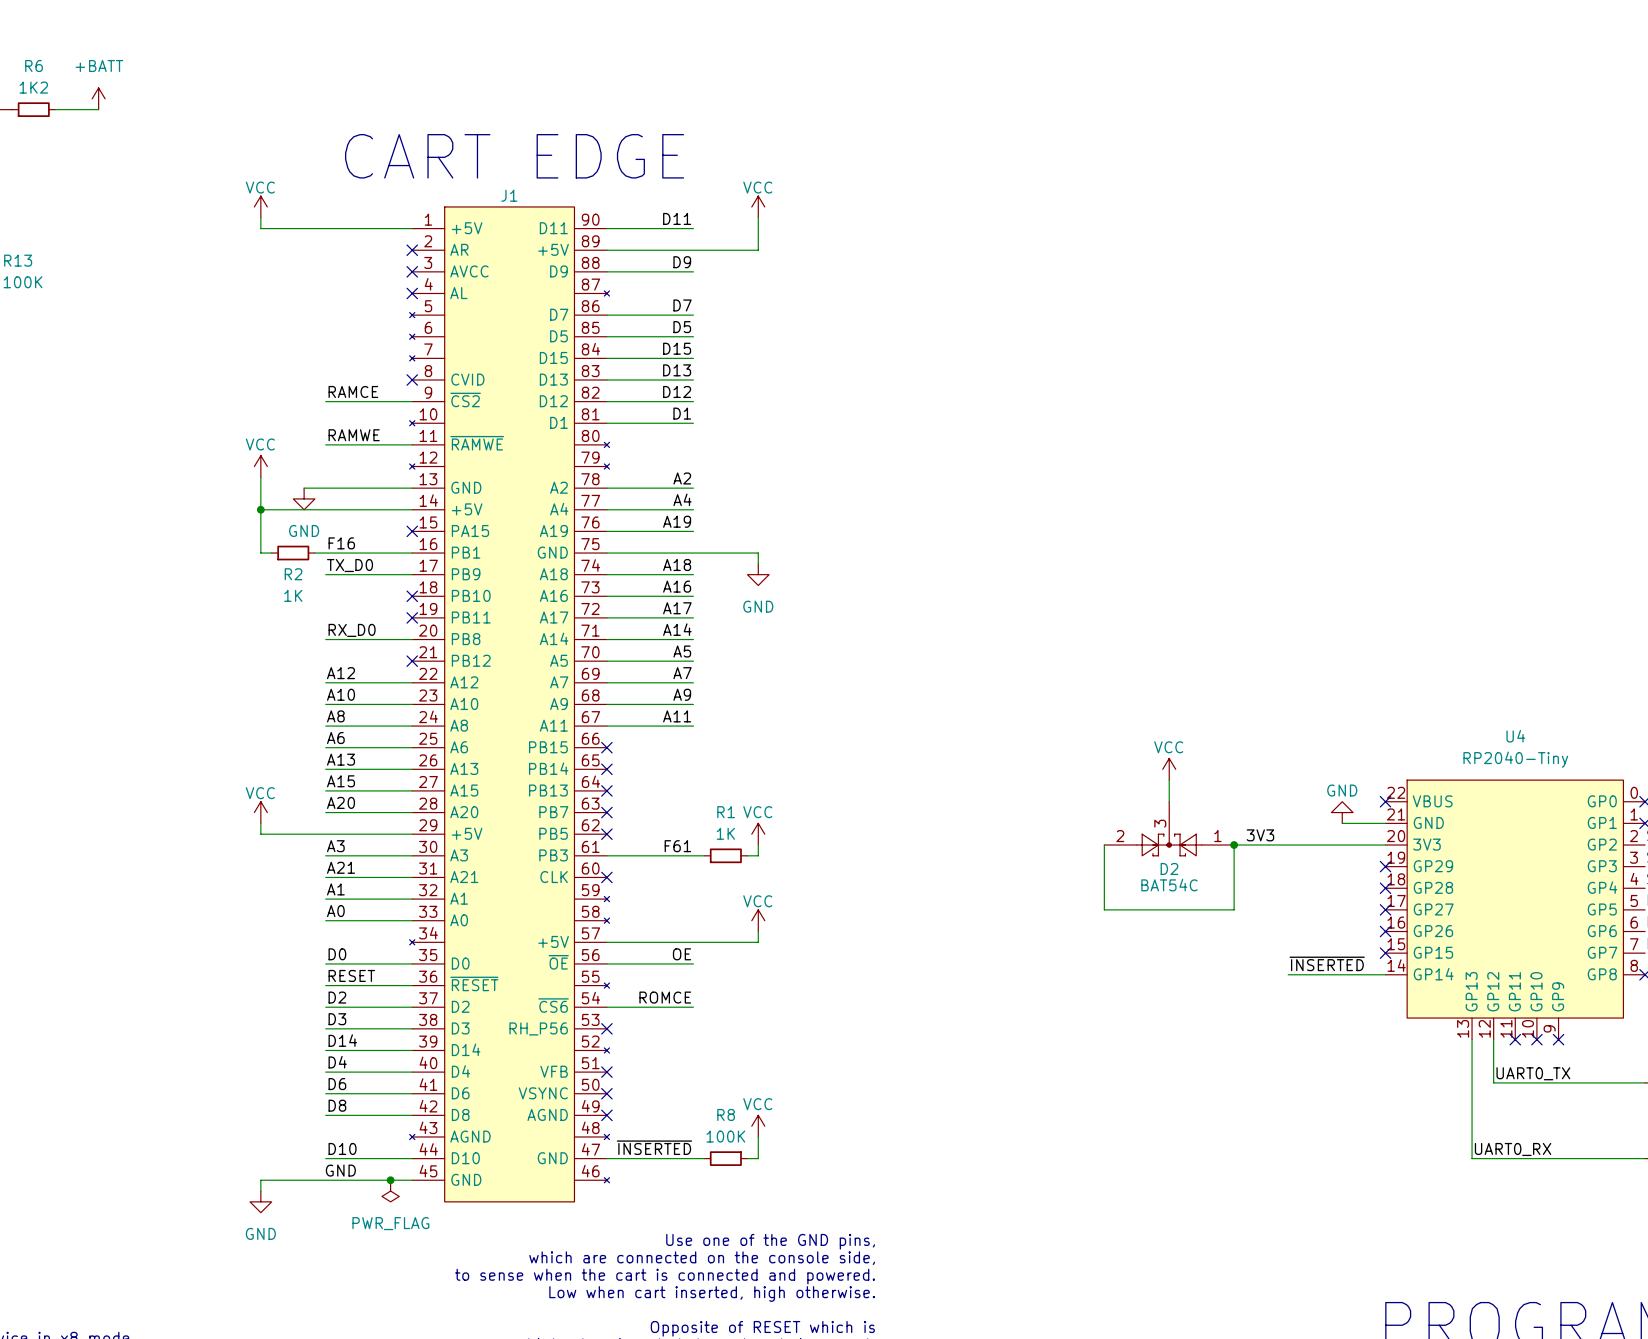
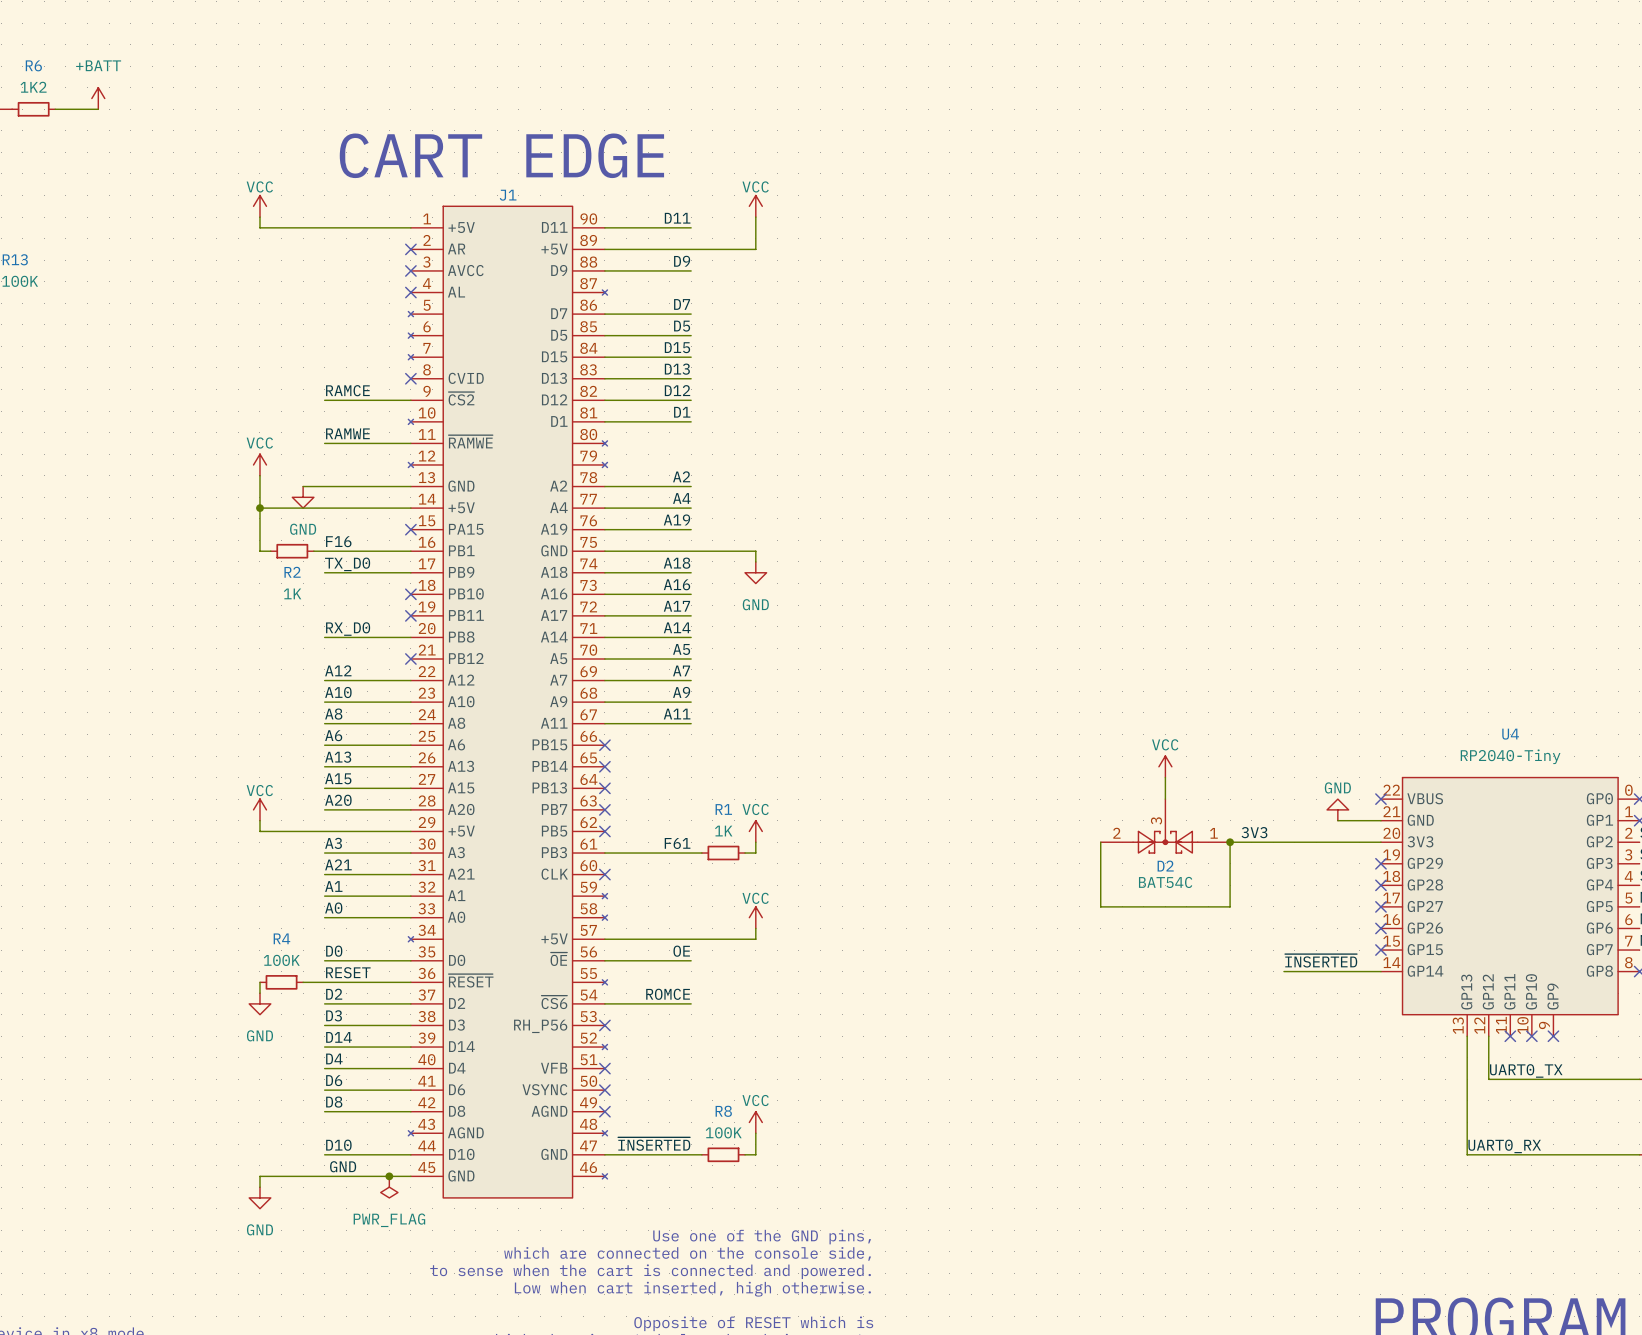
wire: none -> (259, 982) (259, 993)
R4: none -> 100K (281, 982)
wire: none -> (303, 982) (324, 982)
power symbol: none -> GND (259, 1003)

